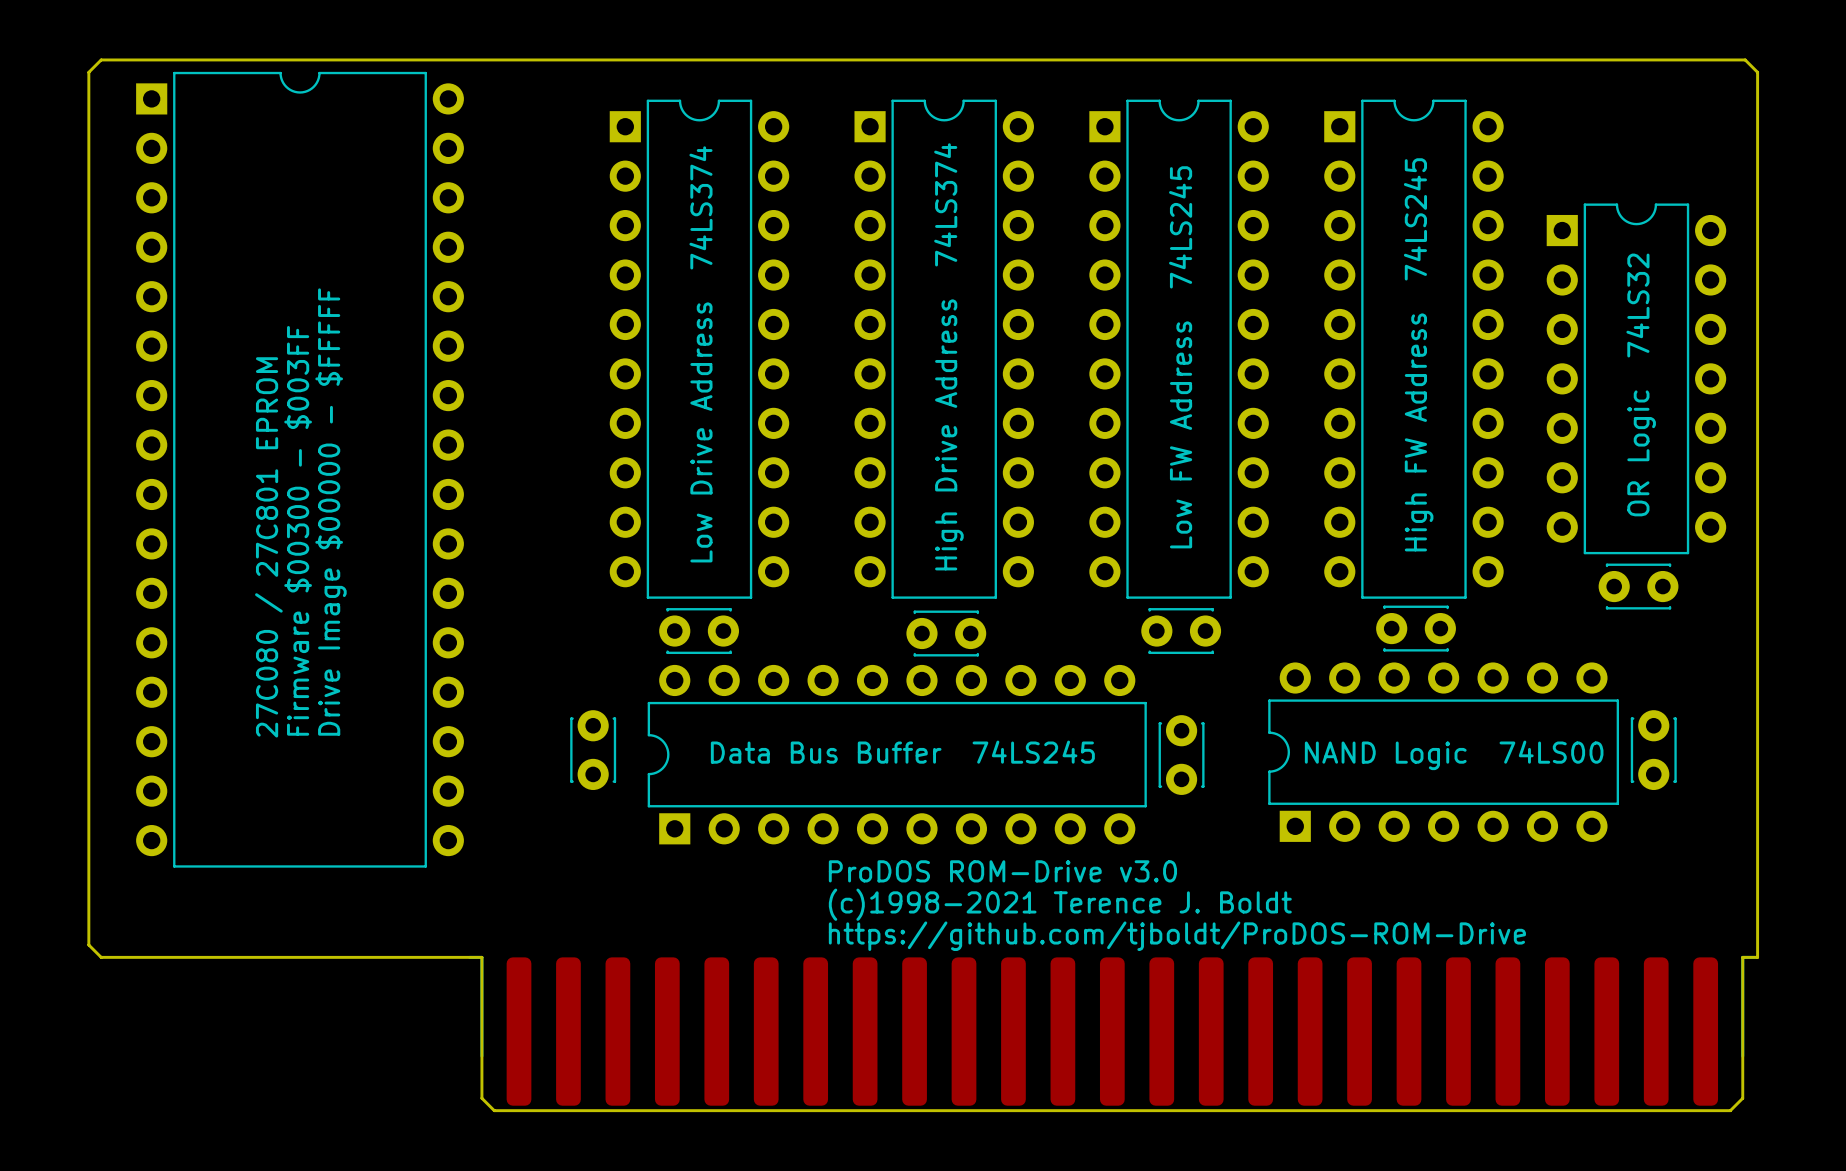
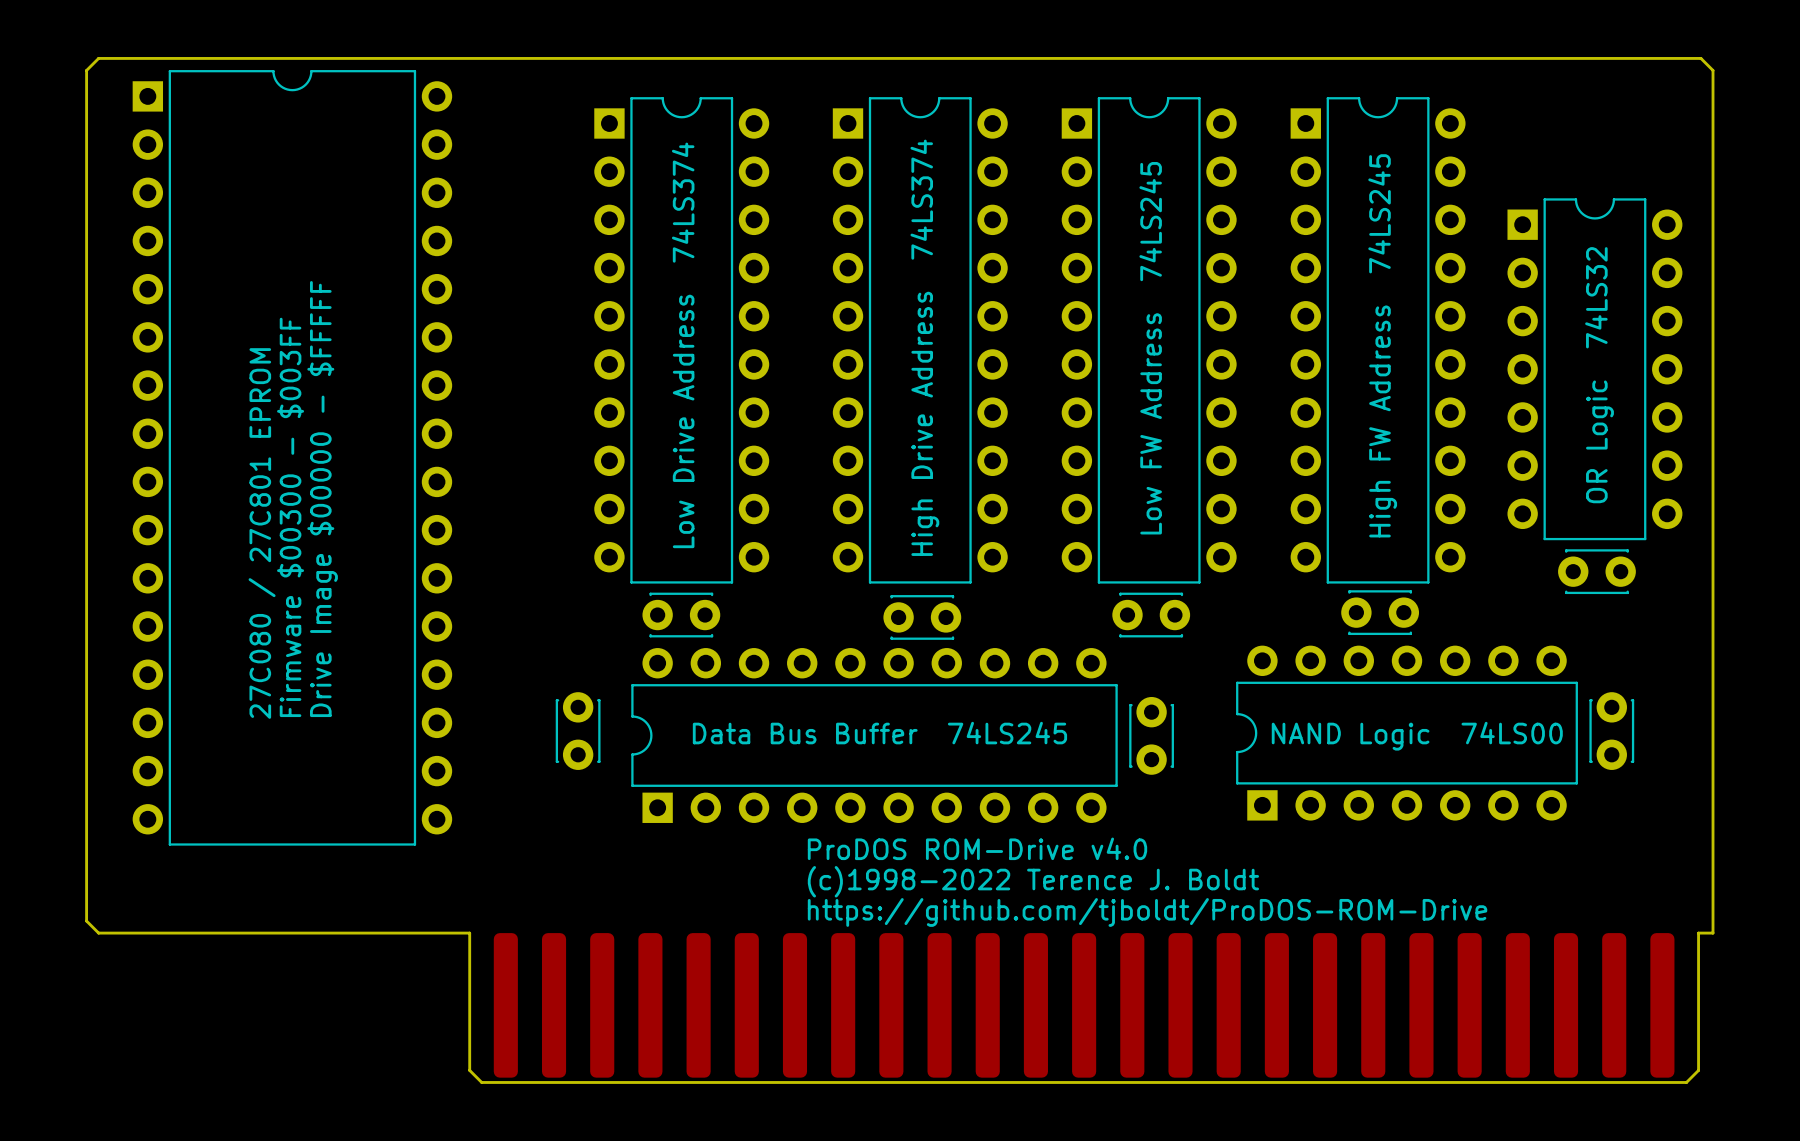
text: ProDOS ROM-Drive v3.0 (1002, 871) -> ProDOS ROM-Drive v4.0 (977, 848)
text: (c)1998-2021 Terence J. Boldt (1060, 904) -> (c)1998-2022 Terence J. Boldt (1033, 881)
part footprint: [468, 955, 1757, 1106] -> [493, 933, 1675, 1078]

